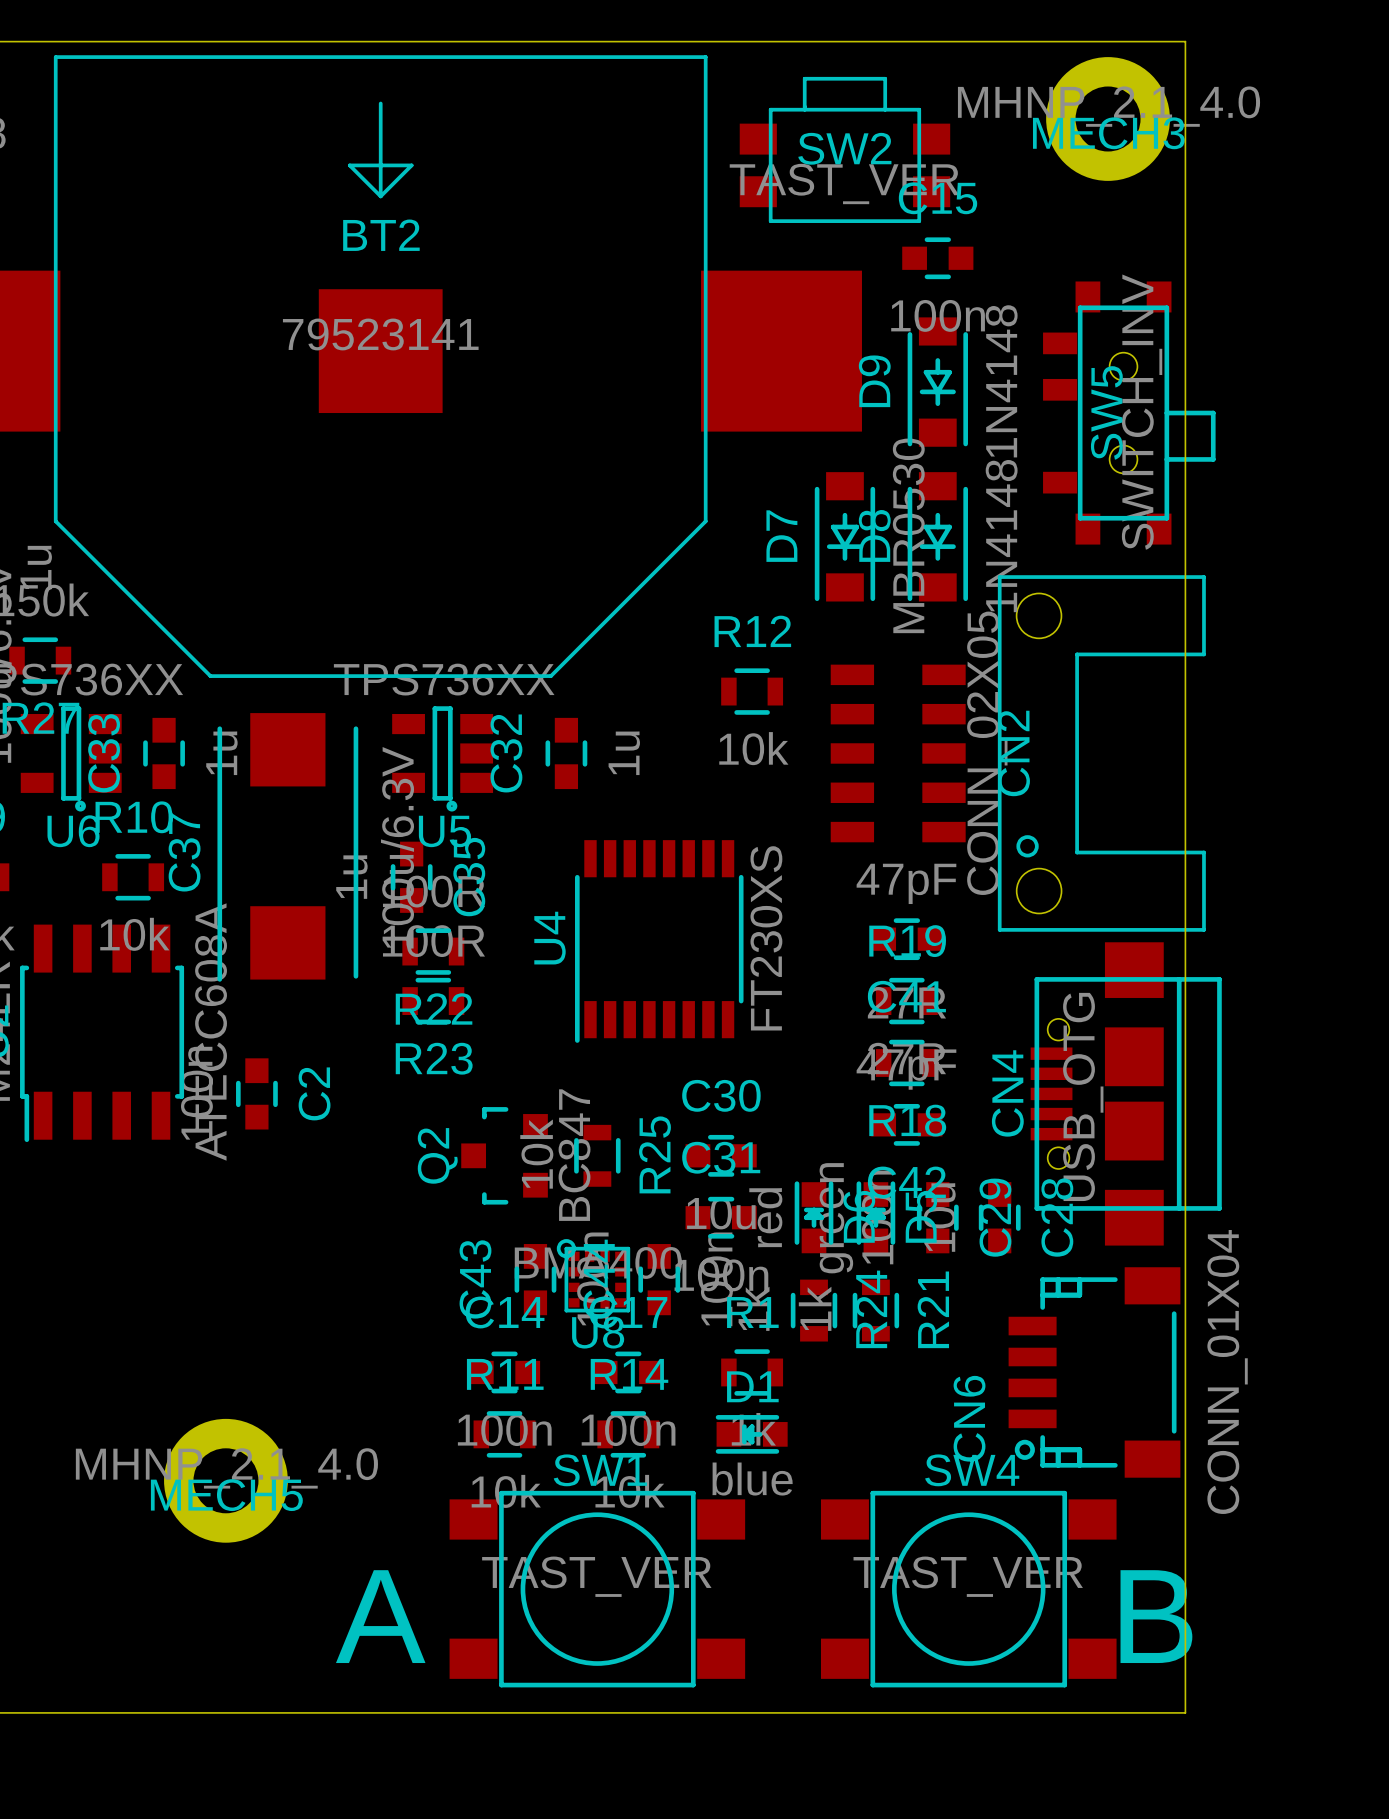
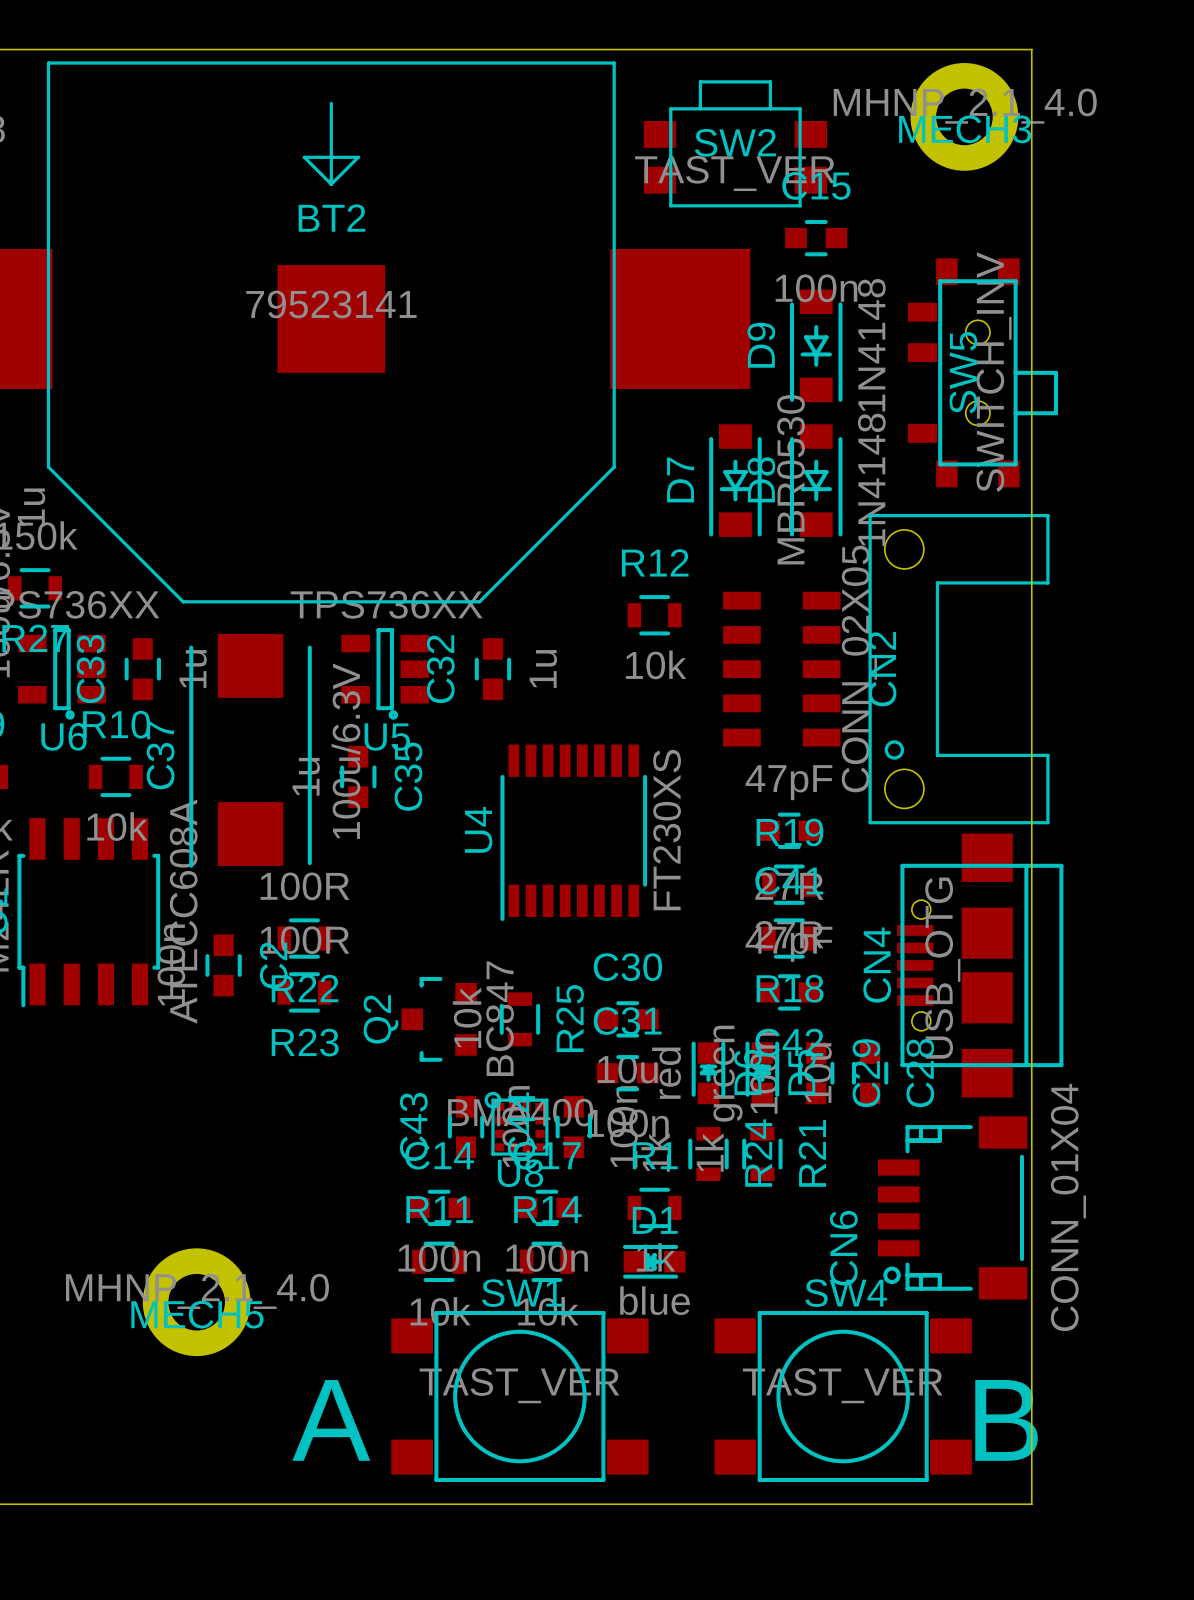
R22 position: (433, 951) -> (304, 938)
R23 position: (433, 1001) -> (304, 992)

